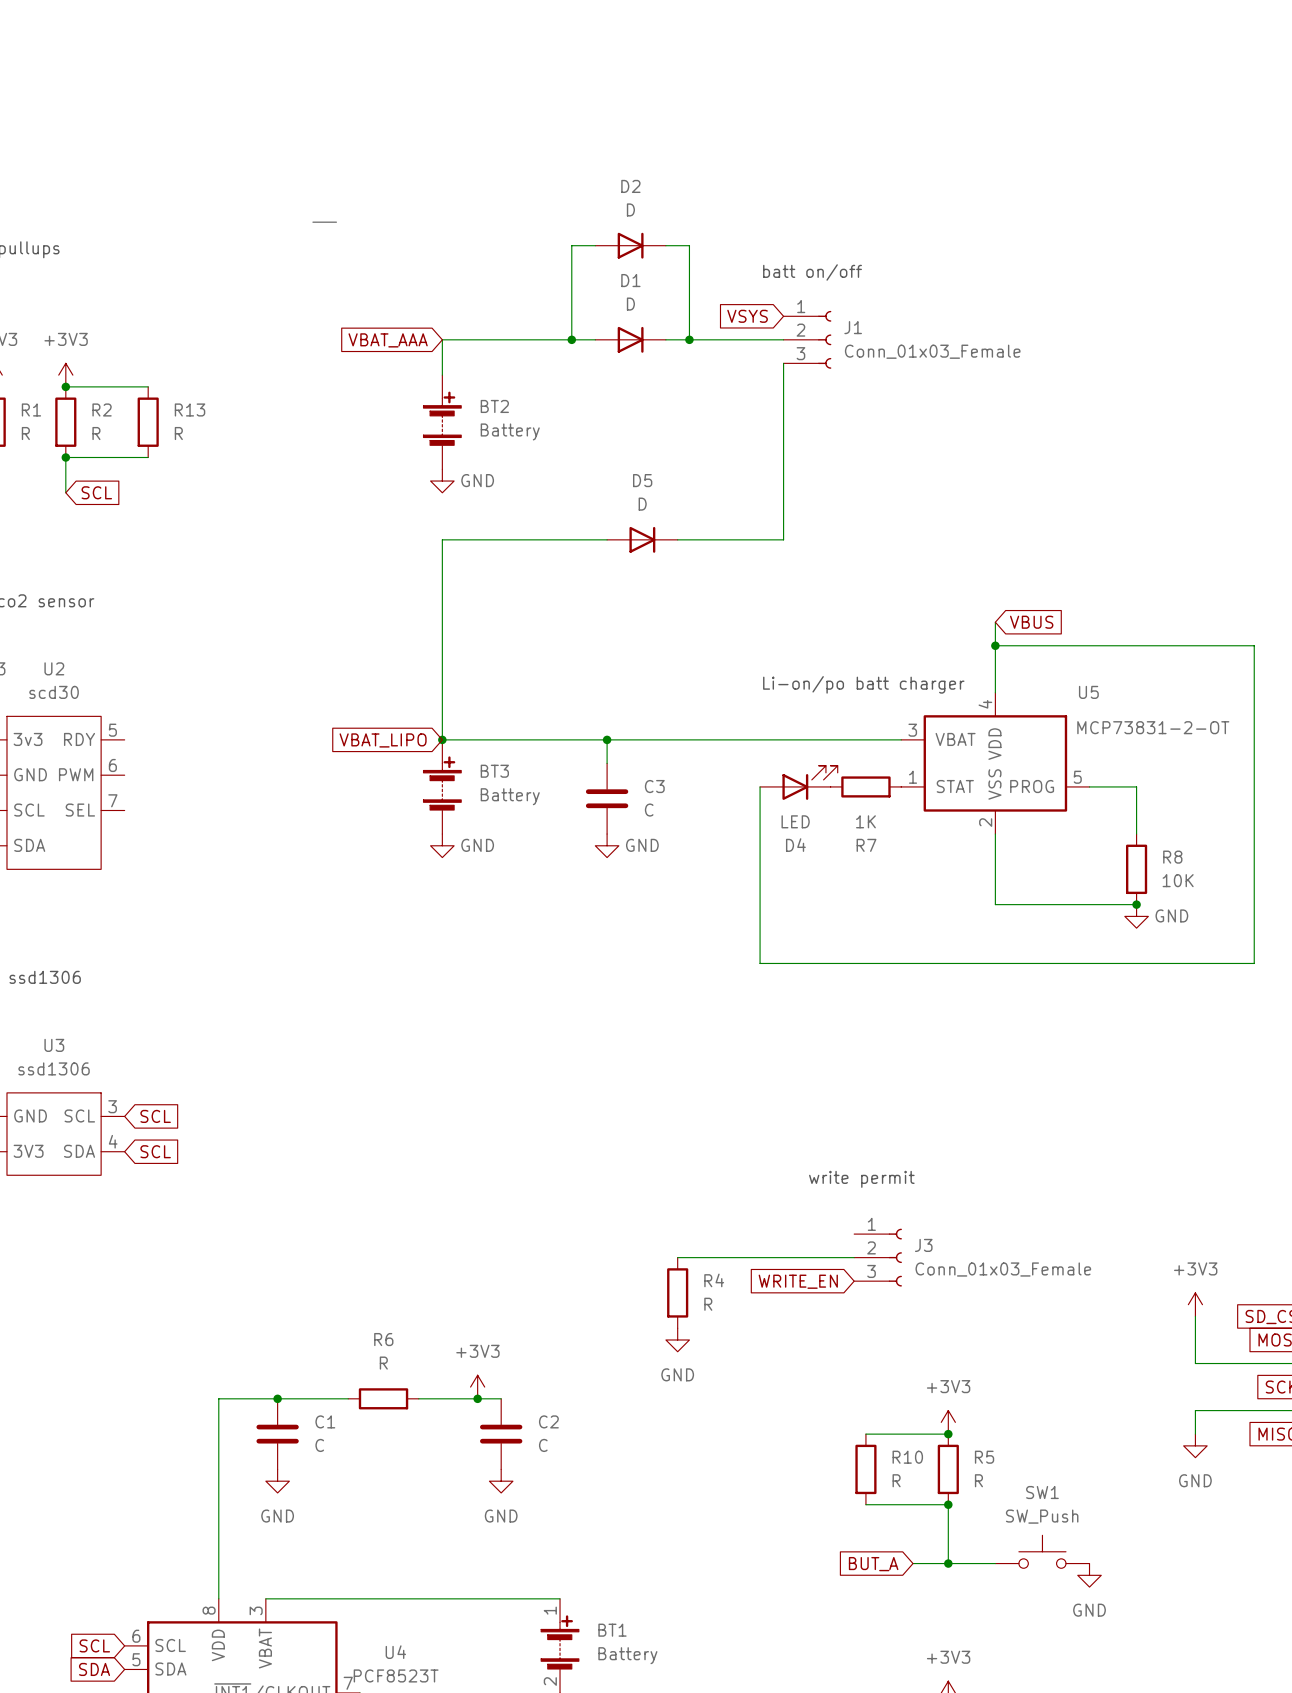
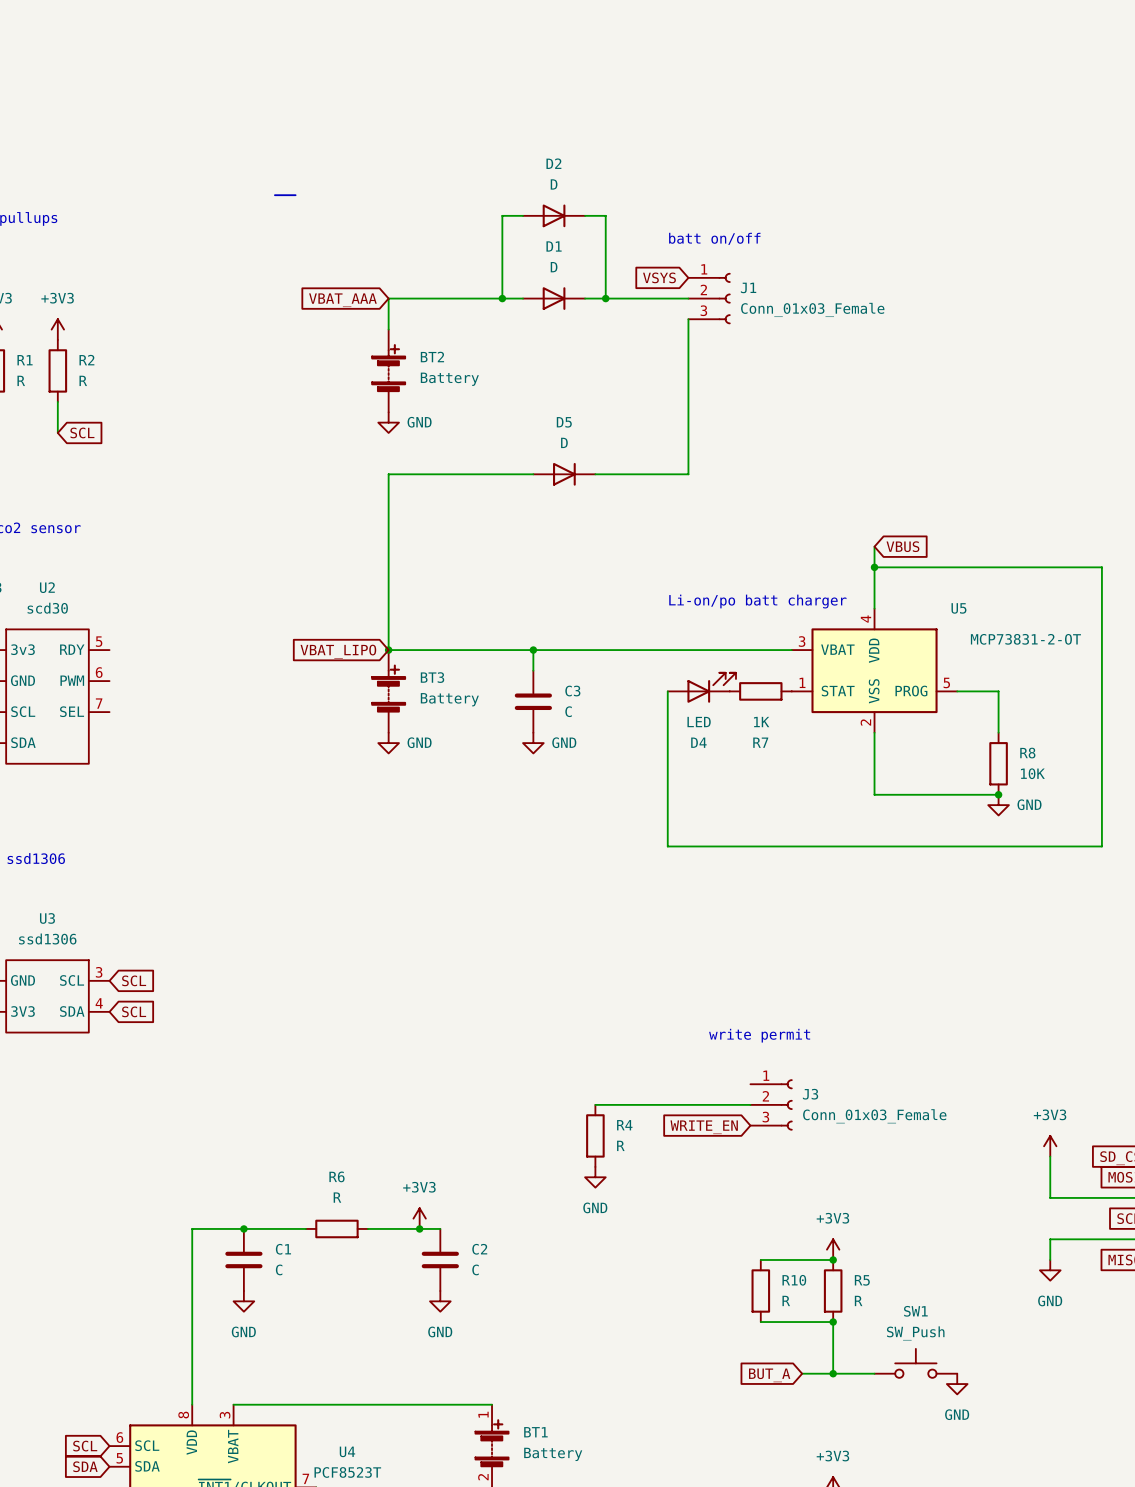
wire: (65, 386) (148, 386) -> none
junction: (65, 386) -> none
R13: R (148, 422) -> none
wire: (65, 457) (148, 457) -> none
junction: (65, 457) -> none

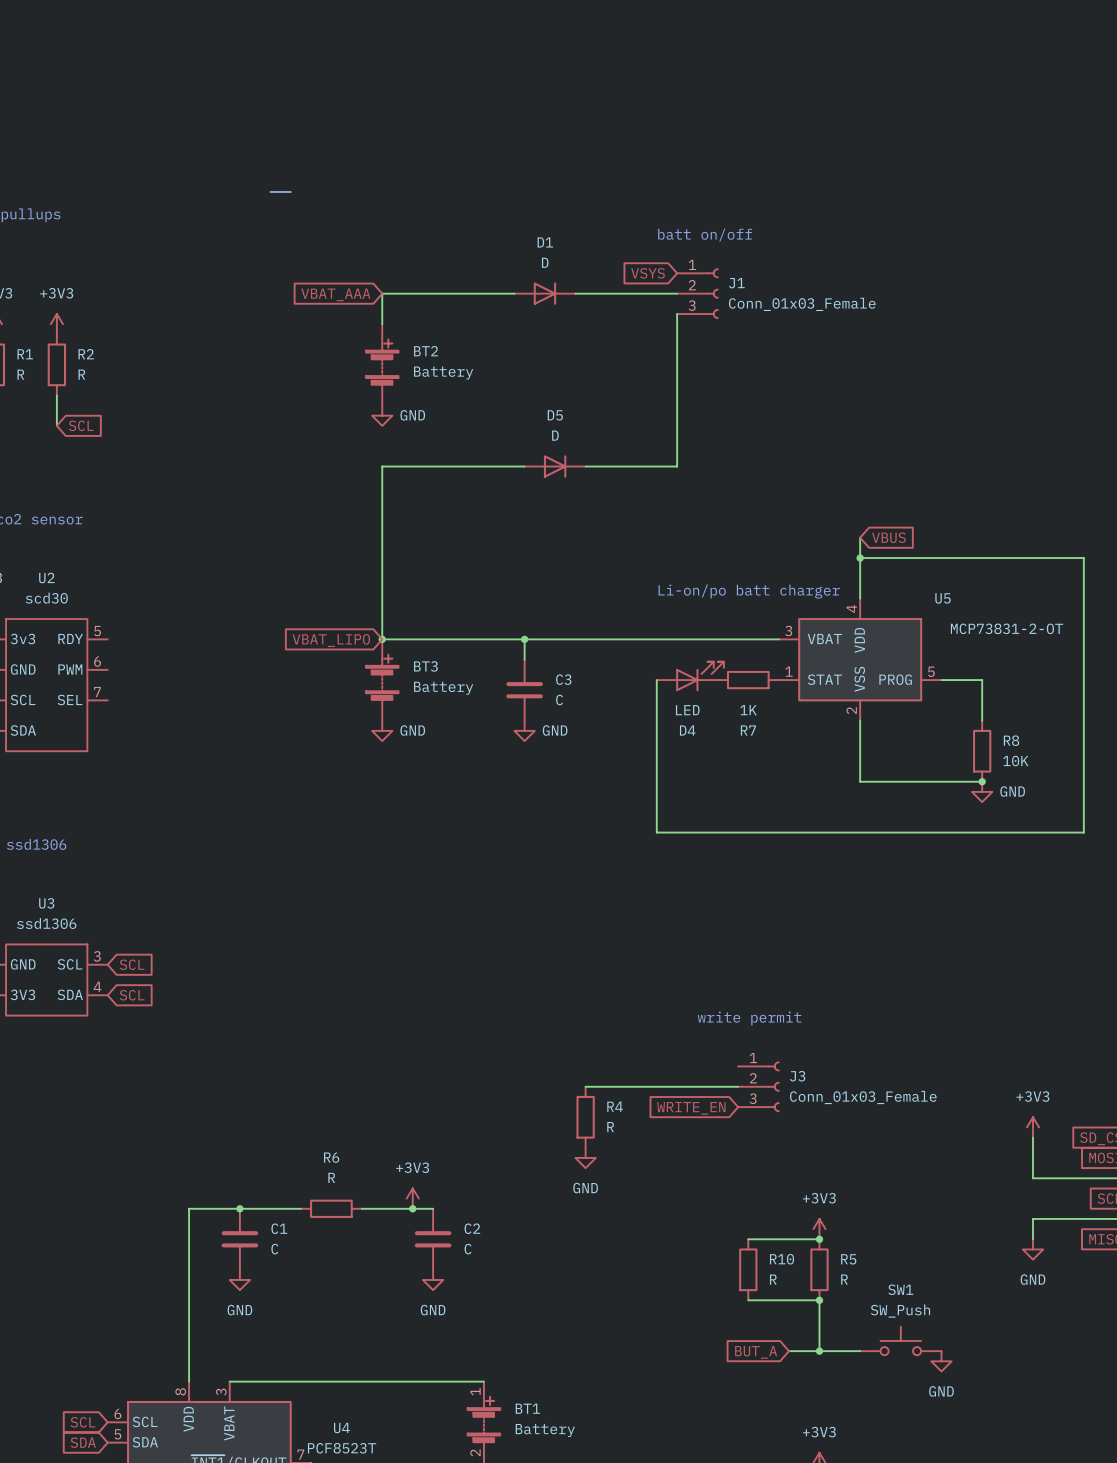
wire: (523, 215) (502, 215) (502, 298) -> none
D2: D (554, 215) -> none
wire: (585, 215) (605, 215) (605, 298) -> none
junction: (502, 298) -> none
junction: (605, 298) -> none

